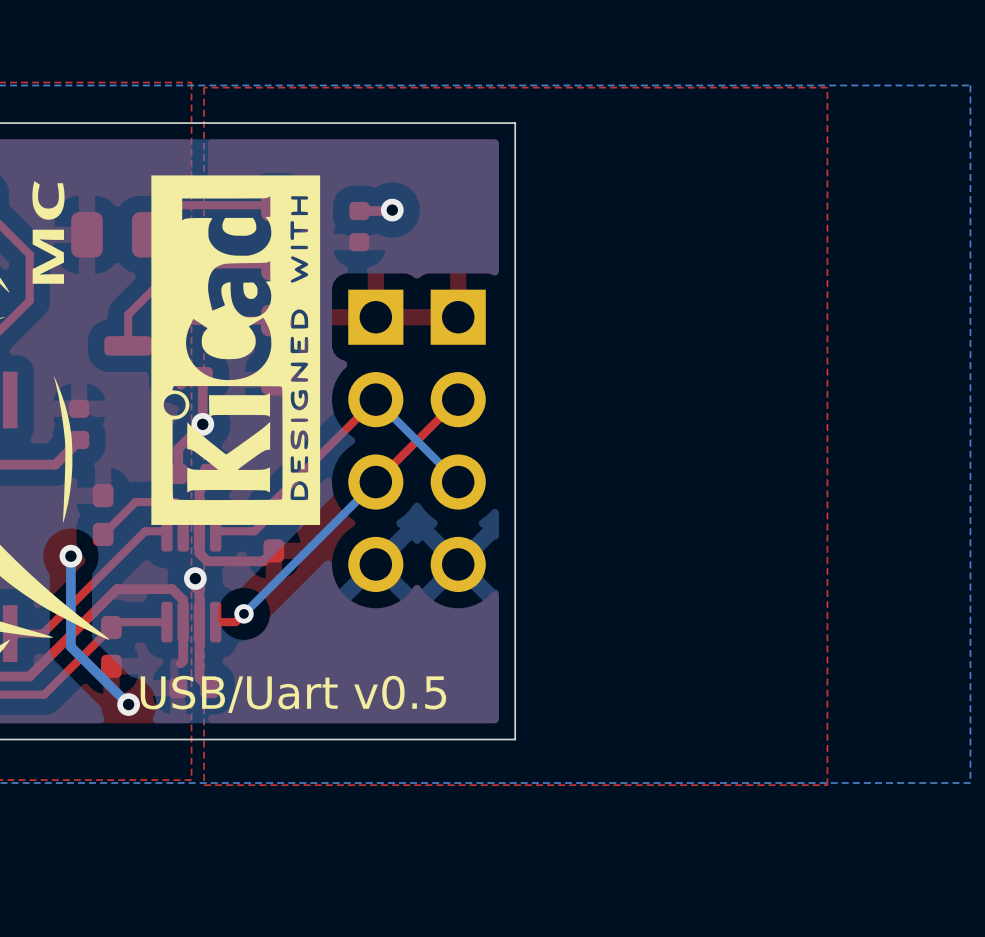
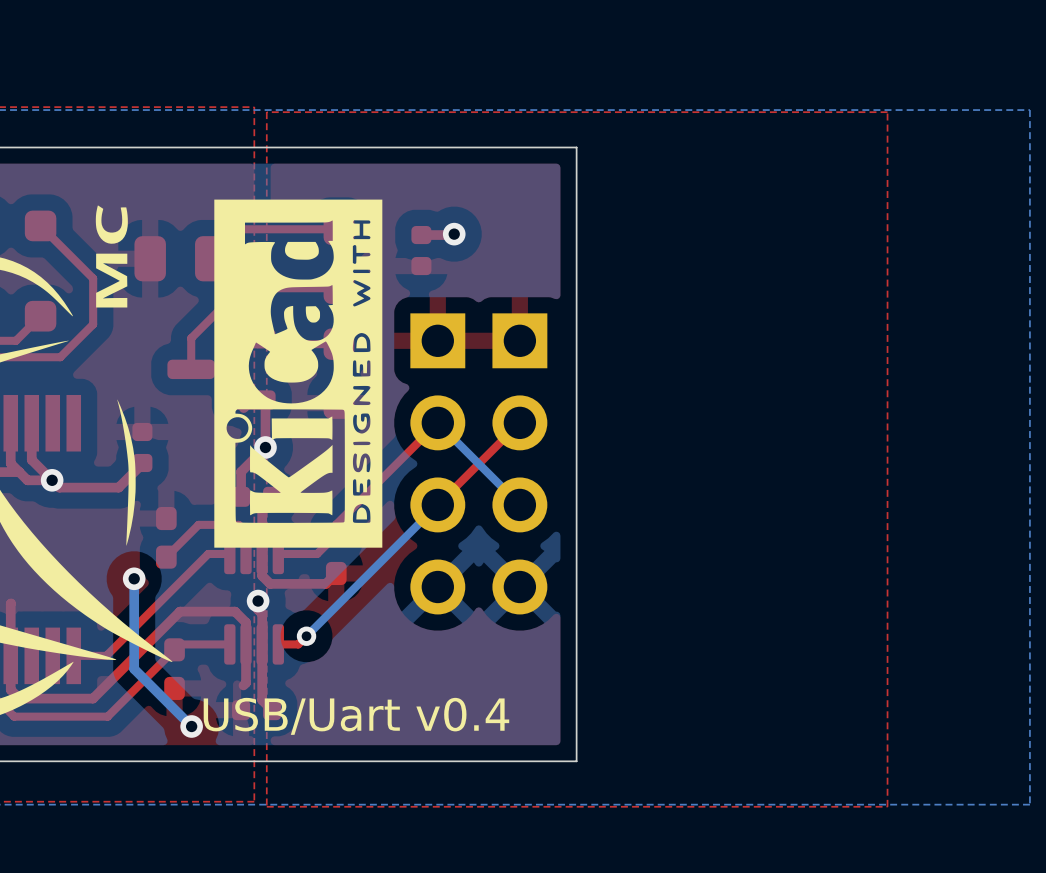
text: USB/Uart v0.5 (293, 694) -> USB/Uart v0.4 (356, 716)

